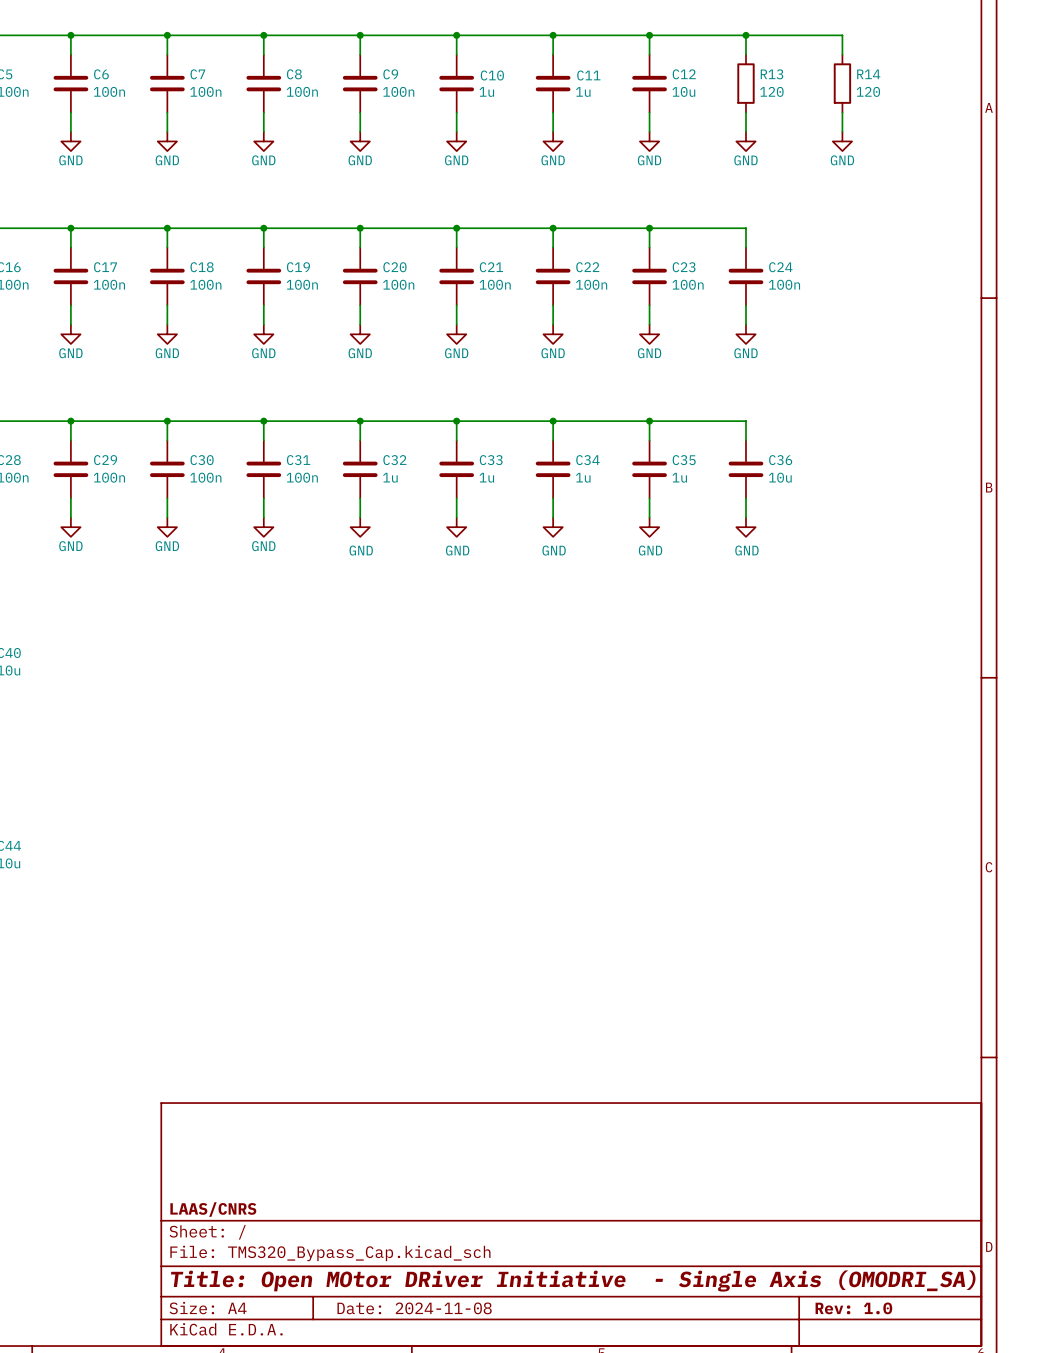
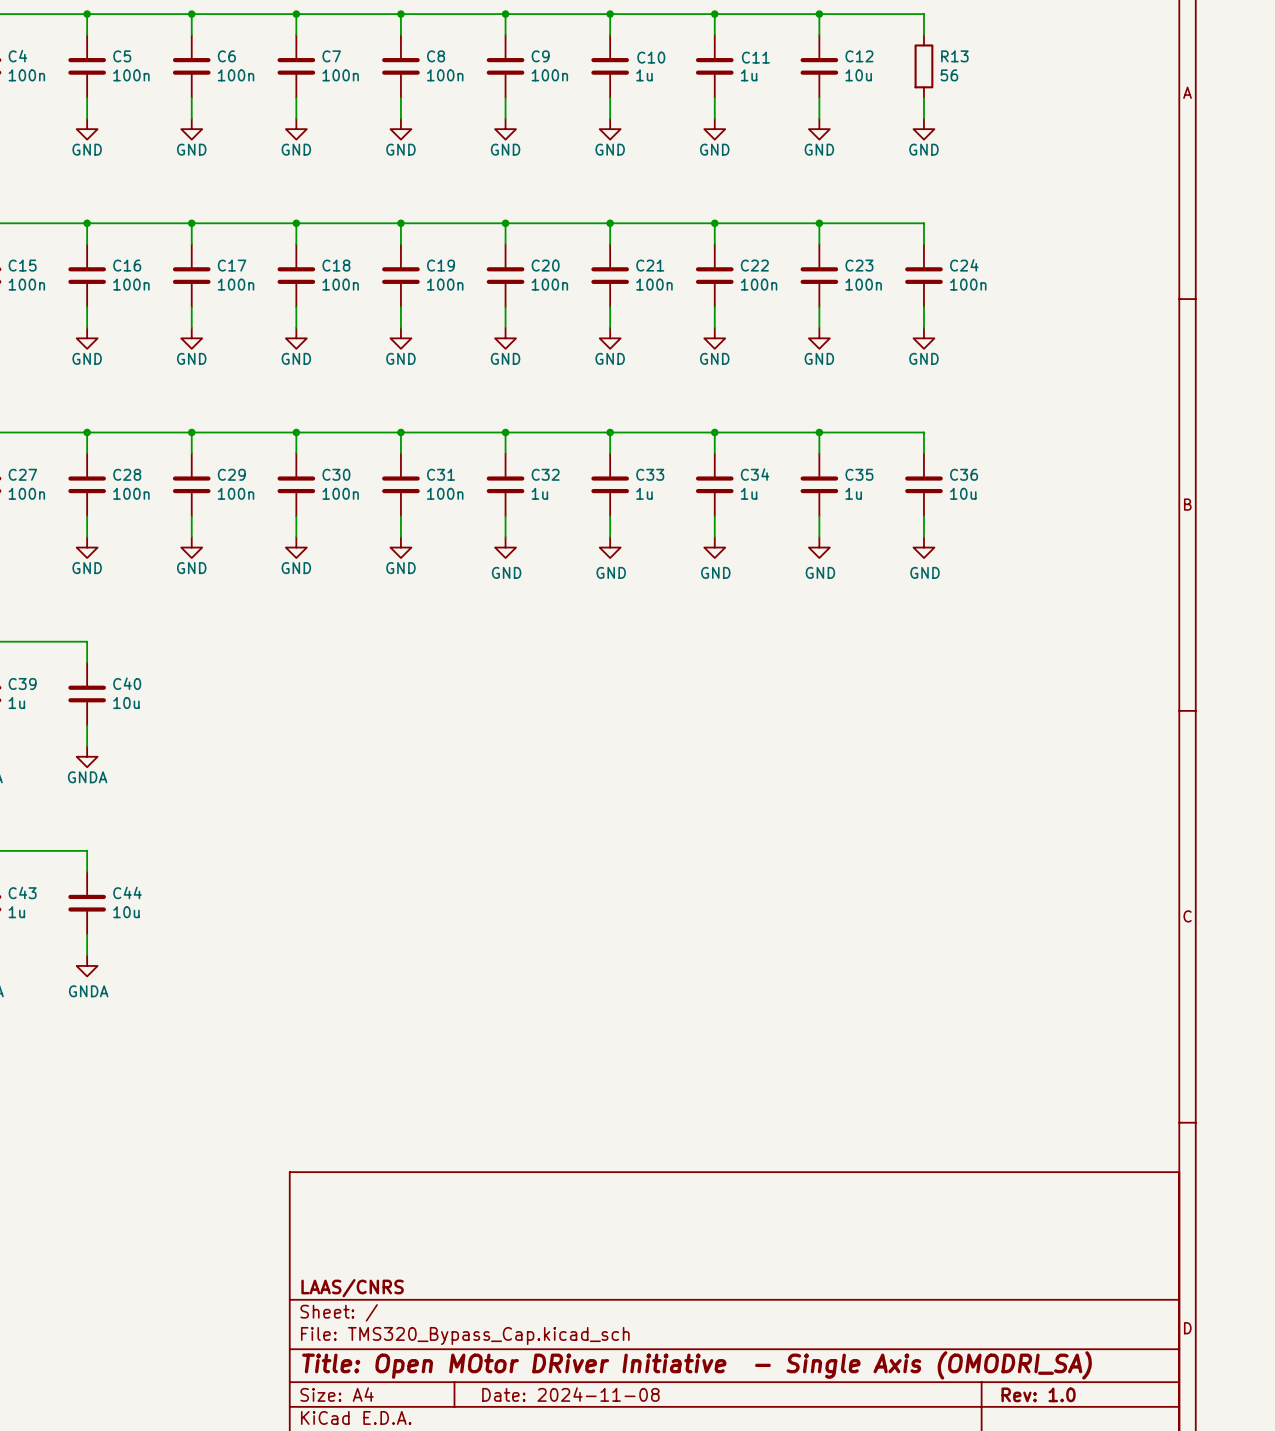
wire: (745, 35) (842, 35) (842, 54) -> none
junction: (745, 35) -> none
R14: 120 (842, 83) -> none
R13 value: 120 (771, 91) -> 56 (949, 75)
wire: (842, 112) (842, 131) -> none
power symbol: GND (842, 141) -> none

